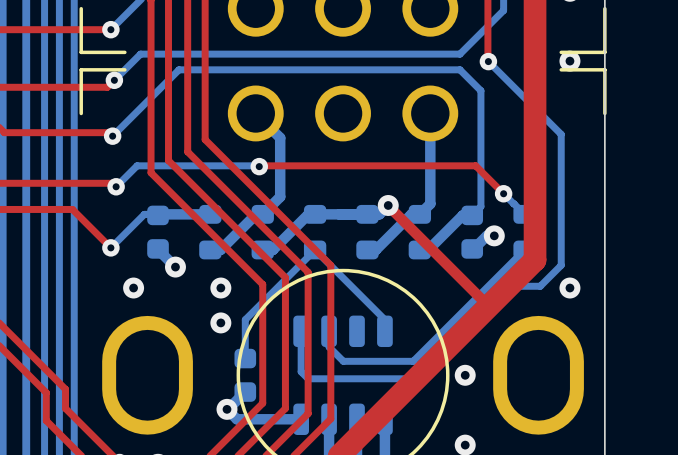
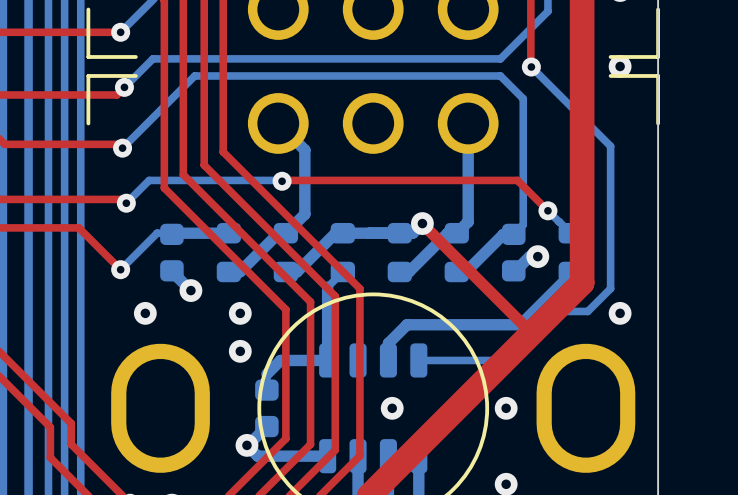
bottom track: (315, 249) (384, 319) (384, 331) -> none
bottom track: (301, 263) (245, 319) (245, 343) -> (327, 287) (327, 360) (280, 360) (266, 374)
bottom track: (476, 298) (413, 361) (343, 361) (329, 347) (329, 331) -> (517, 324) (407, 324) (388, 343) (388, 360)
bottom track: (301, 331) (301, 371) (308, 378) (425, 378) (473, 331) -> (418, 360) (515, 360)
via: none -> (392, 408)

